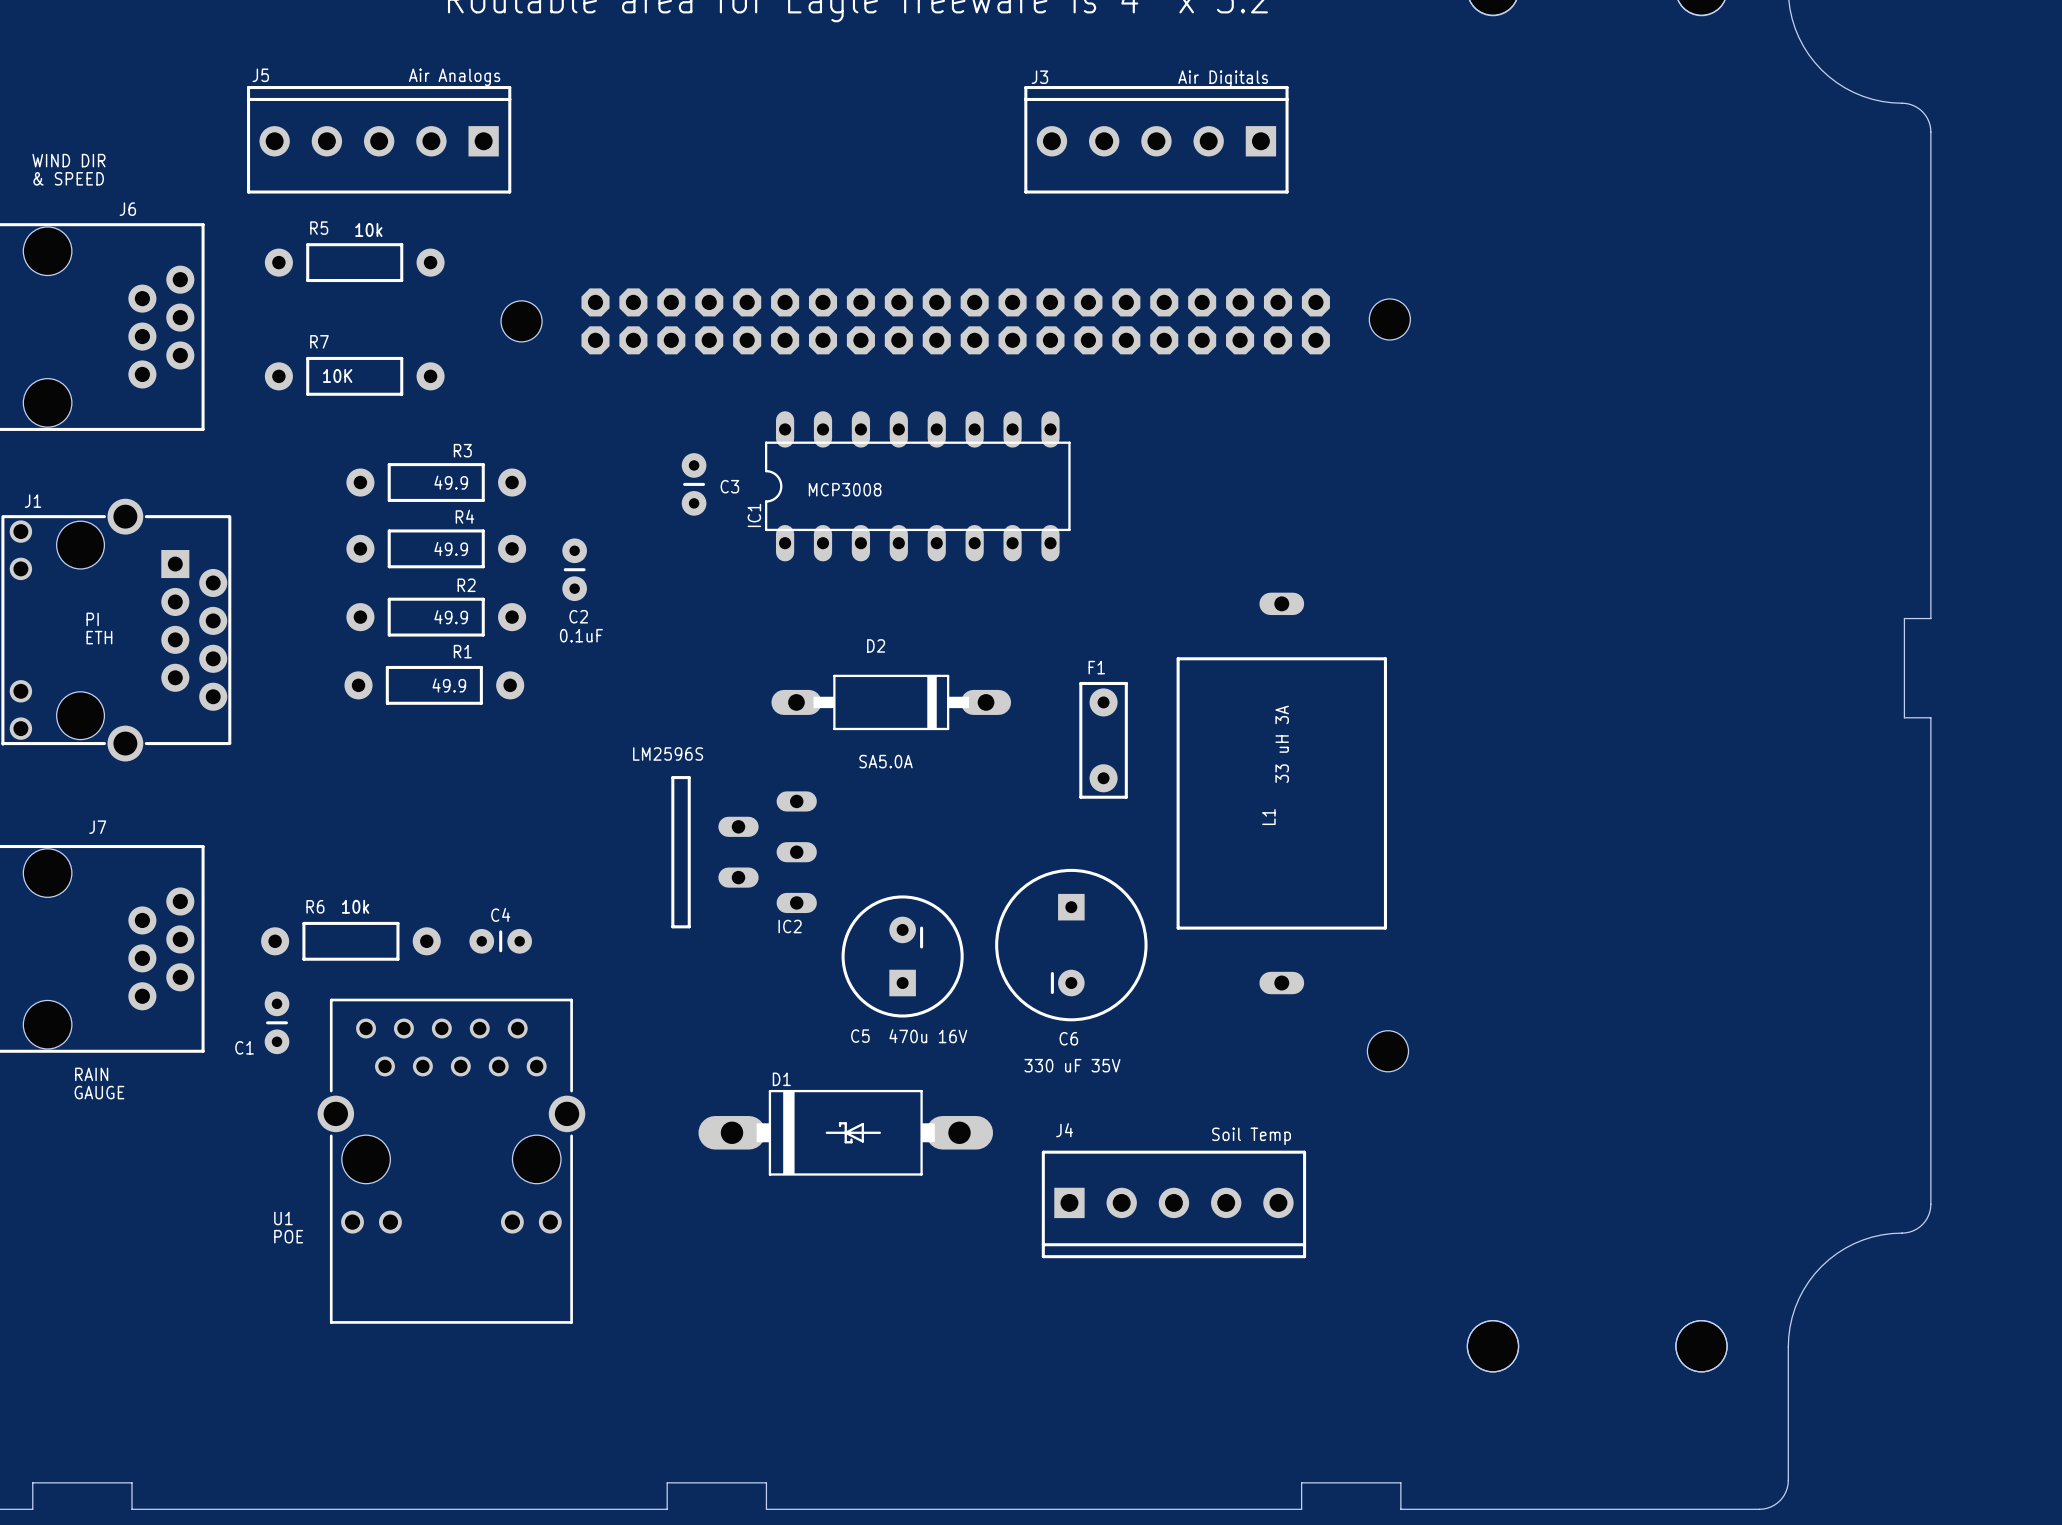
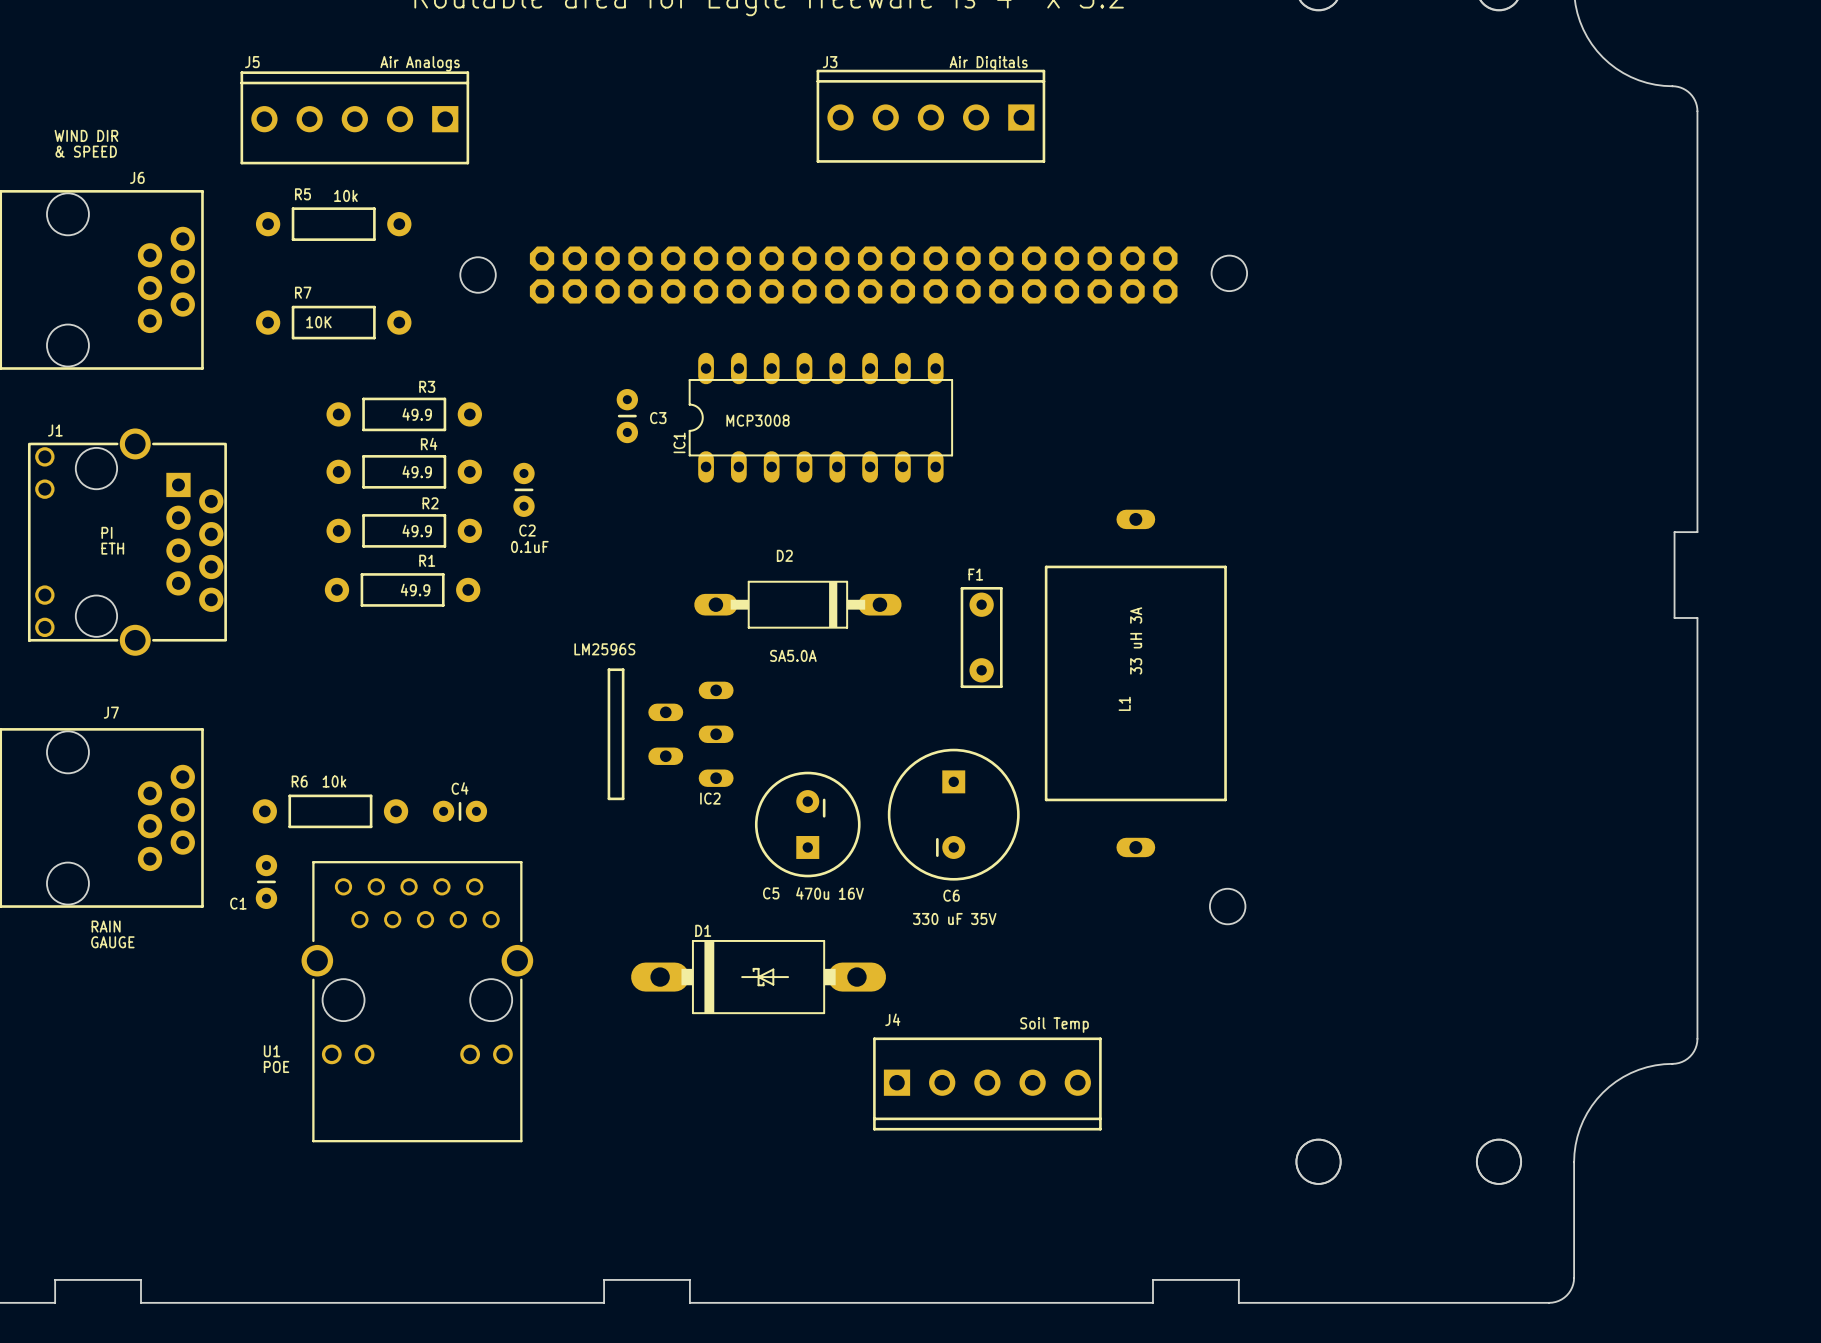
J3 position: (1156, 139) -> (930, 116)
J4 position: (1173, 1204) -> (987, 1083)

